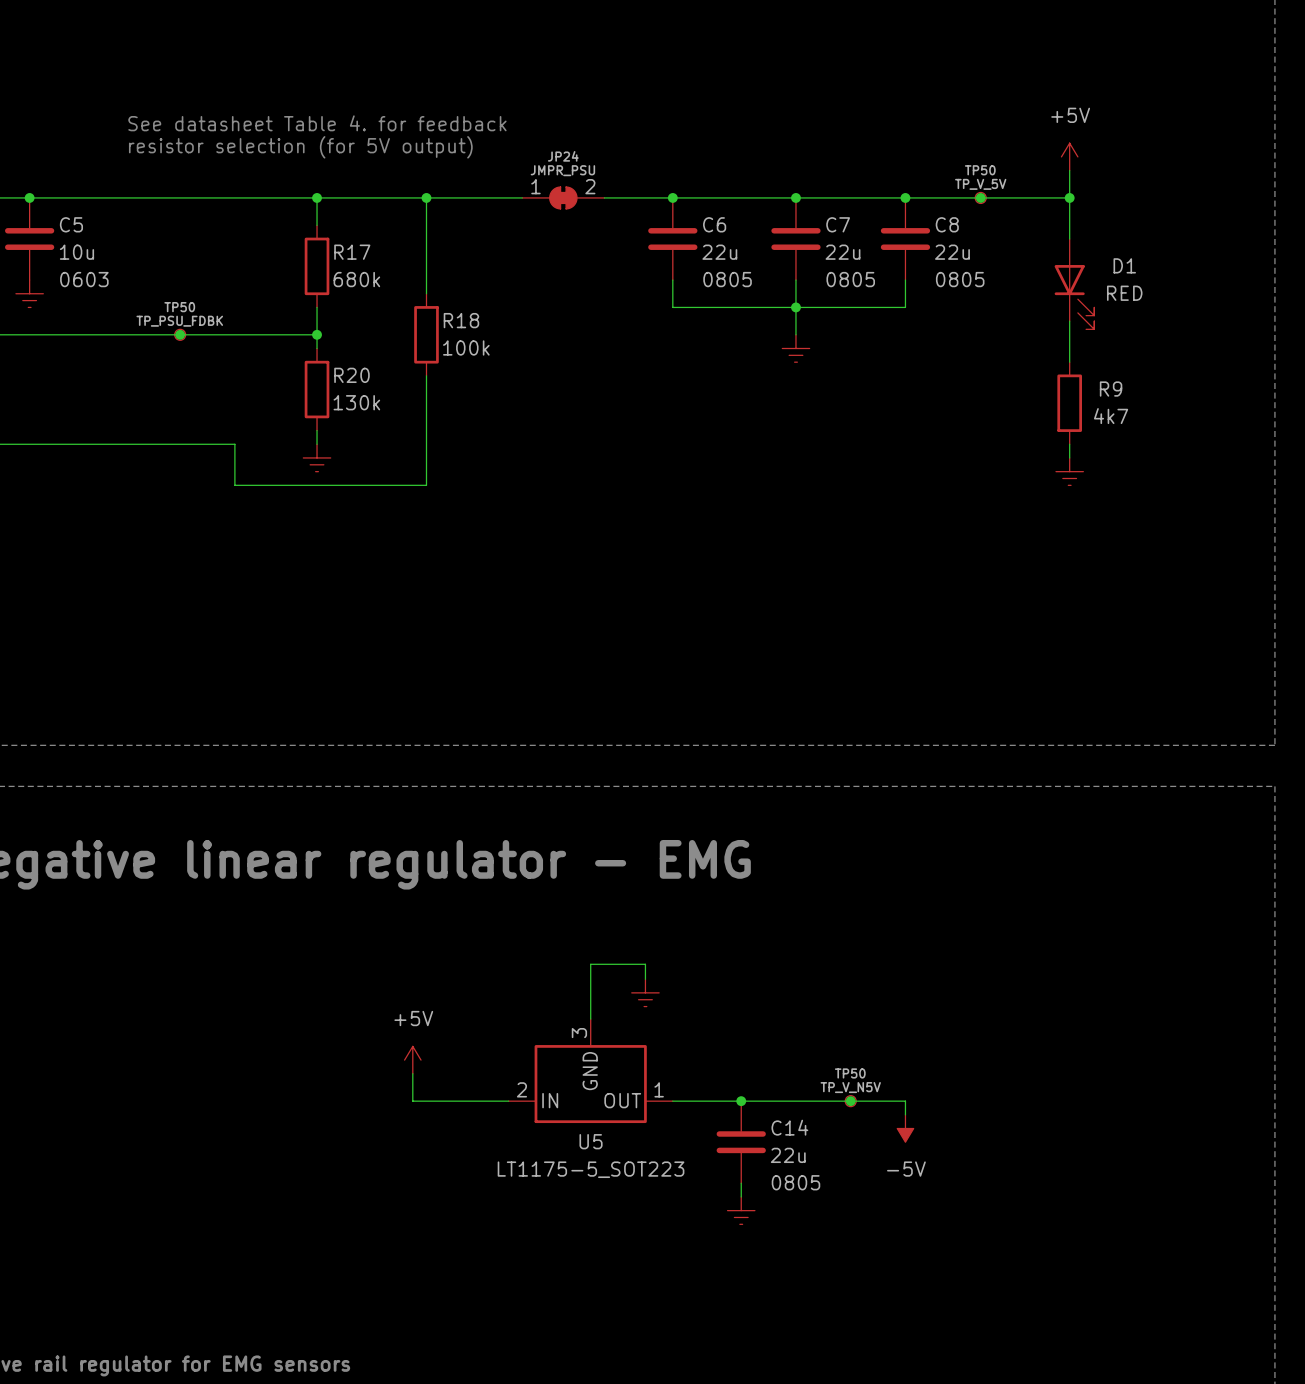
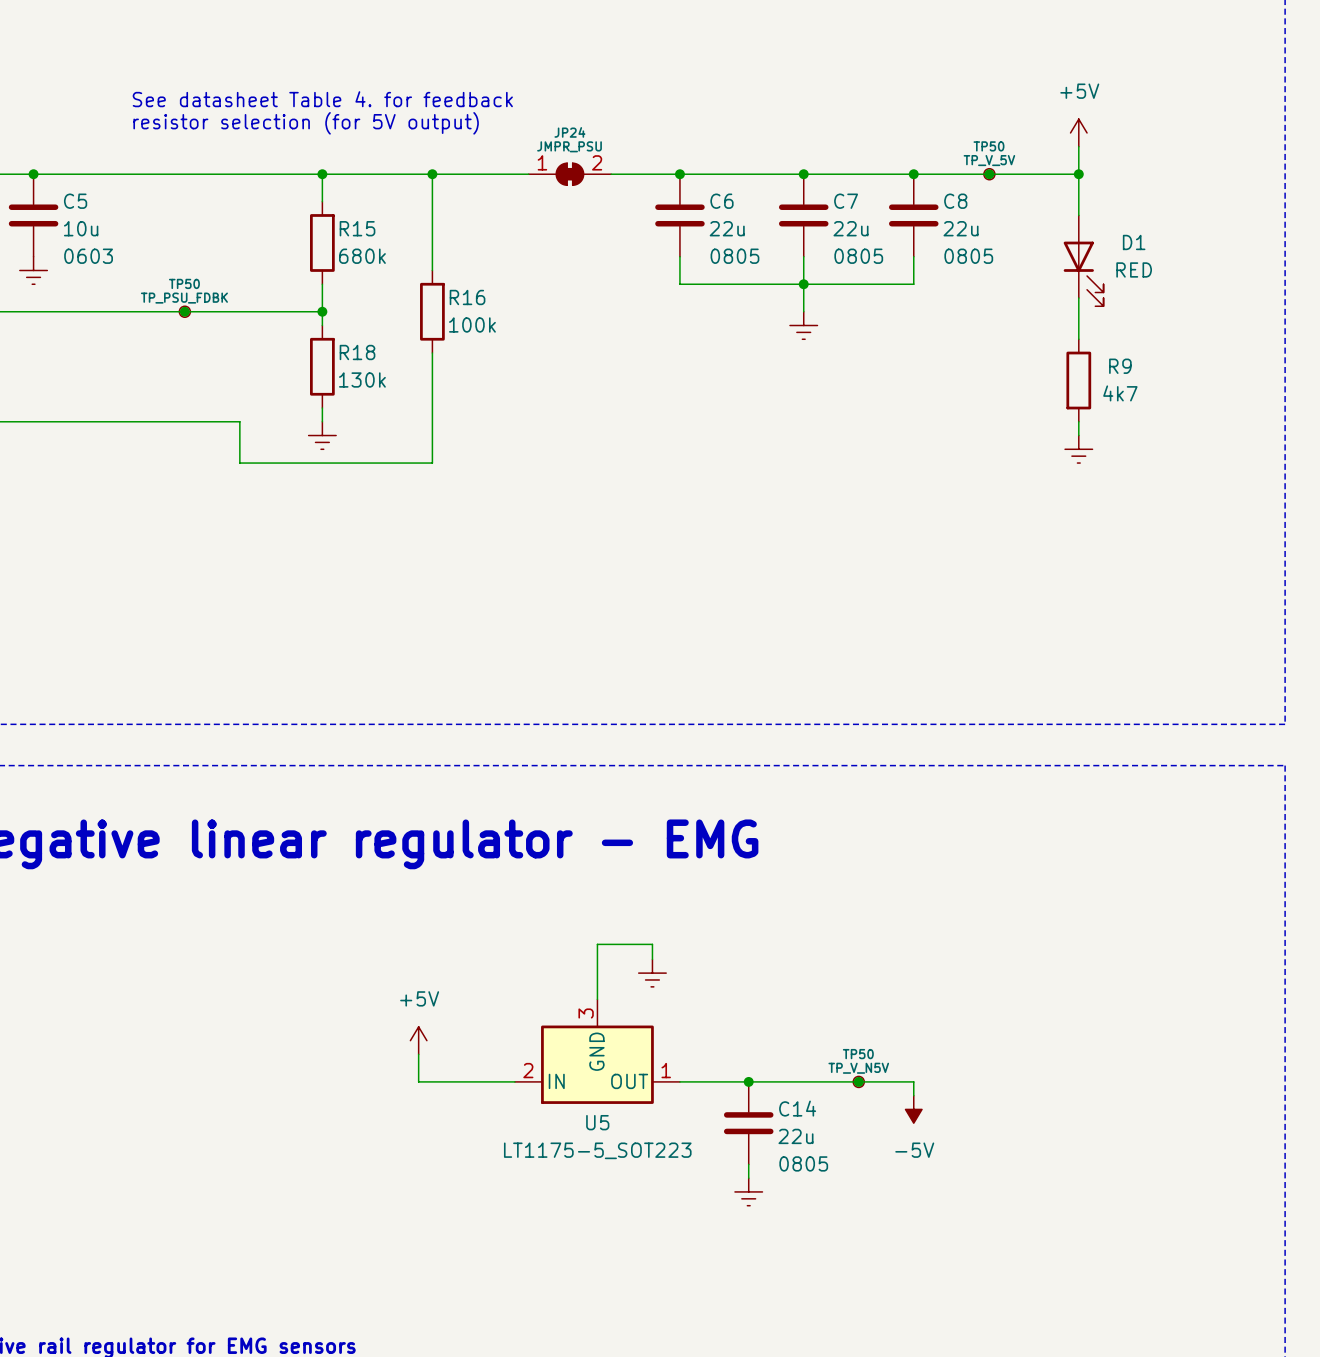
R17 name: R17 (352, 252) -> R15 (357, 228)
R18 name: R18 (461, 320) -> R16 (467, 297)
R20 name: R20 (351, 375) -> R18 (357, 352)

